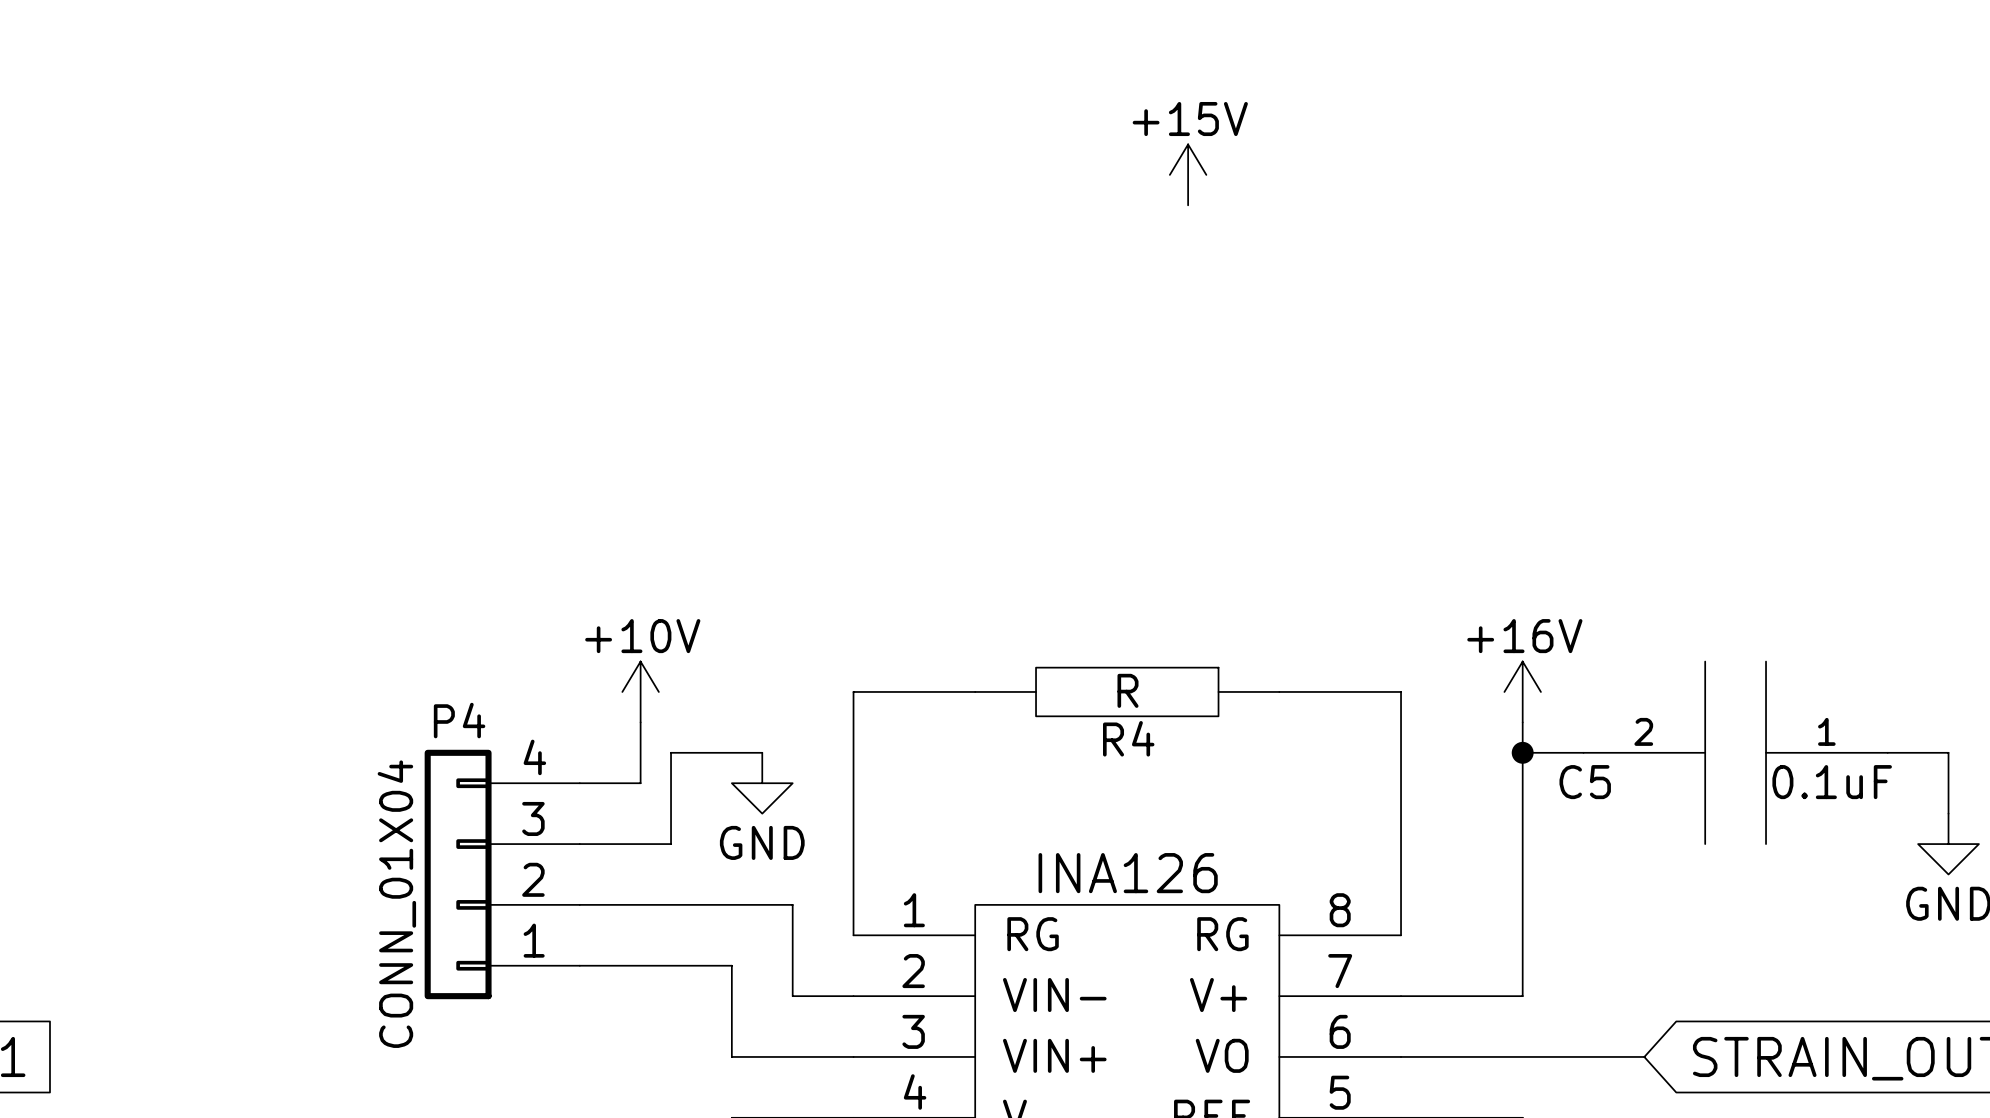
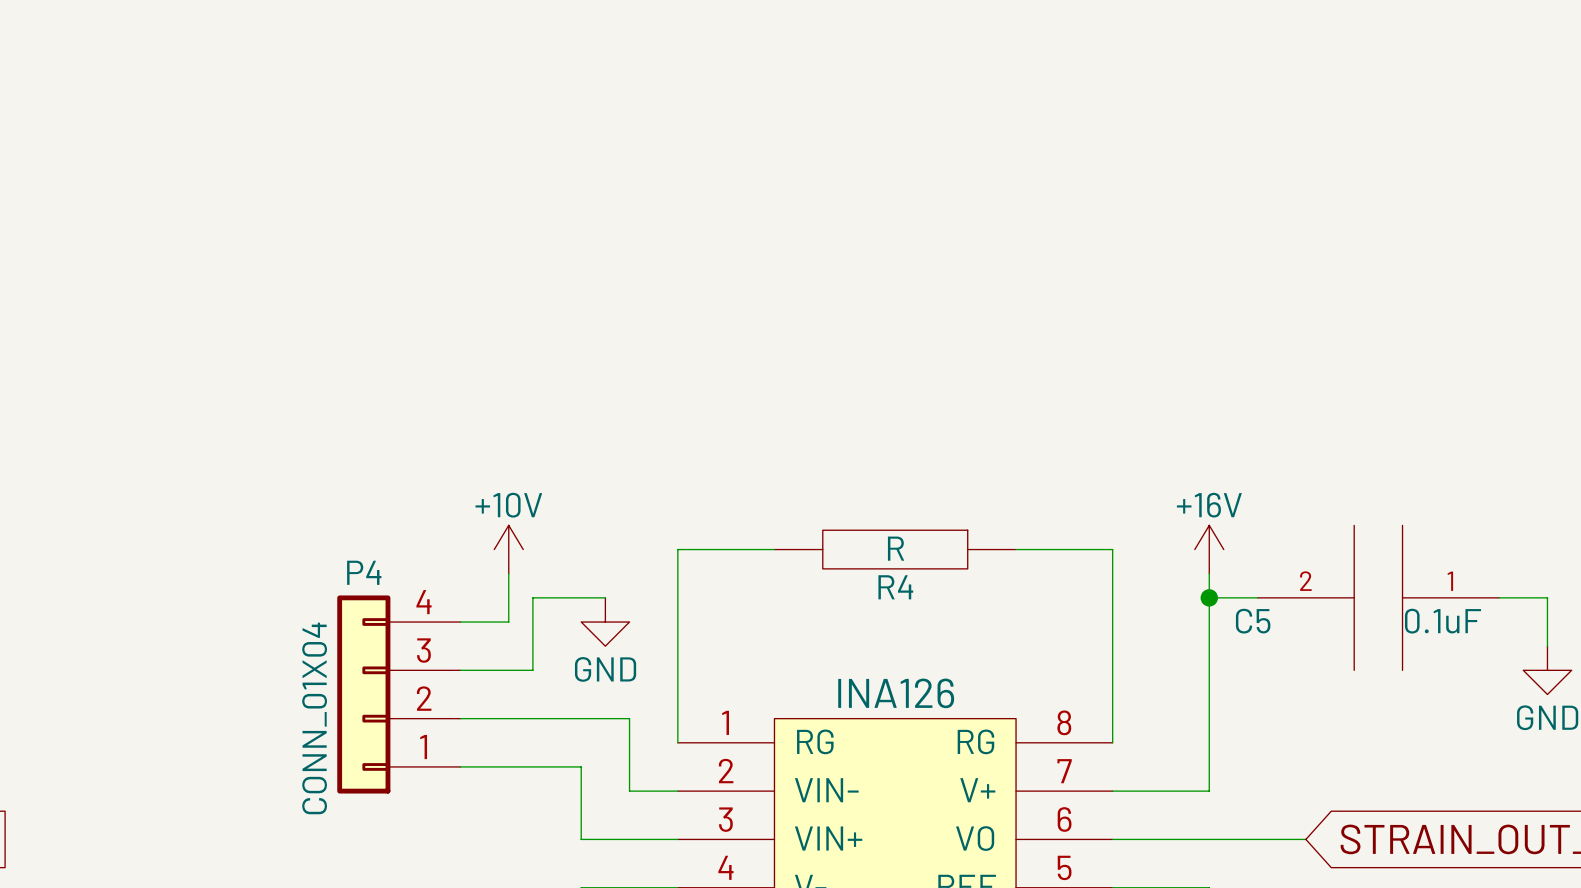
power symbol: +15V (1188, 174) -> none

